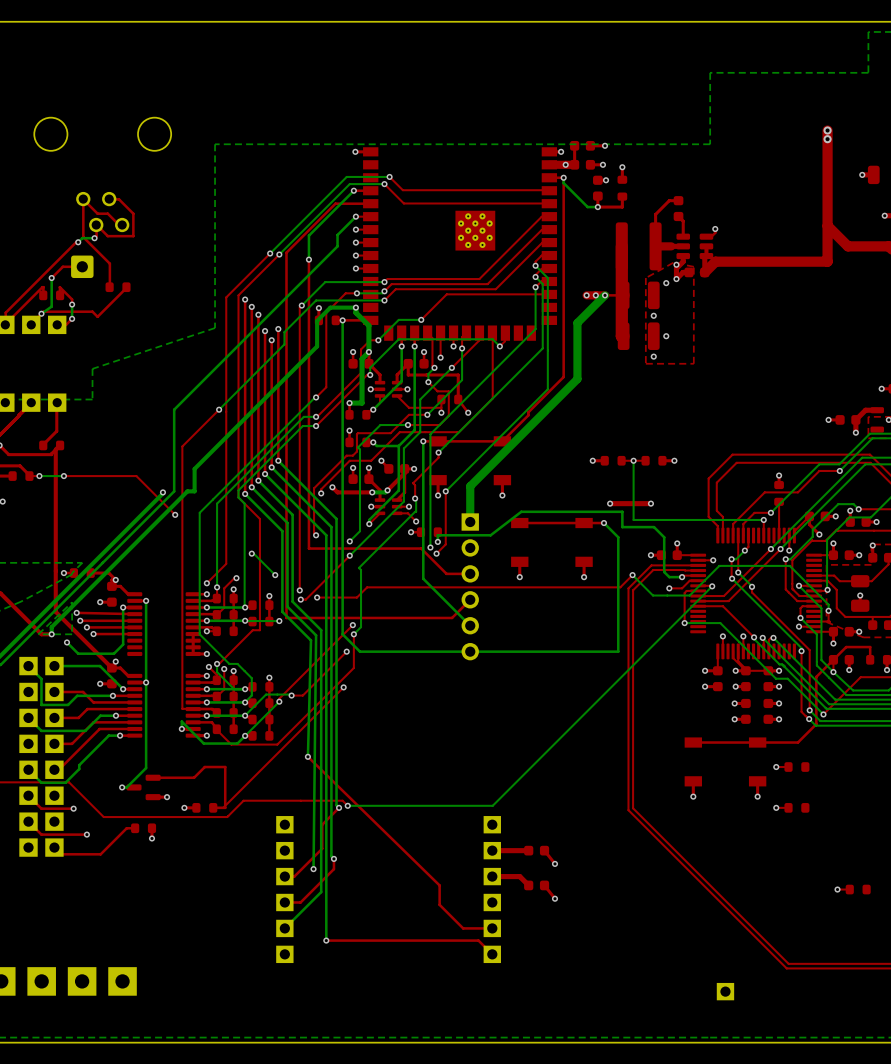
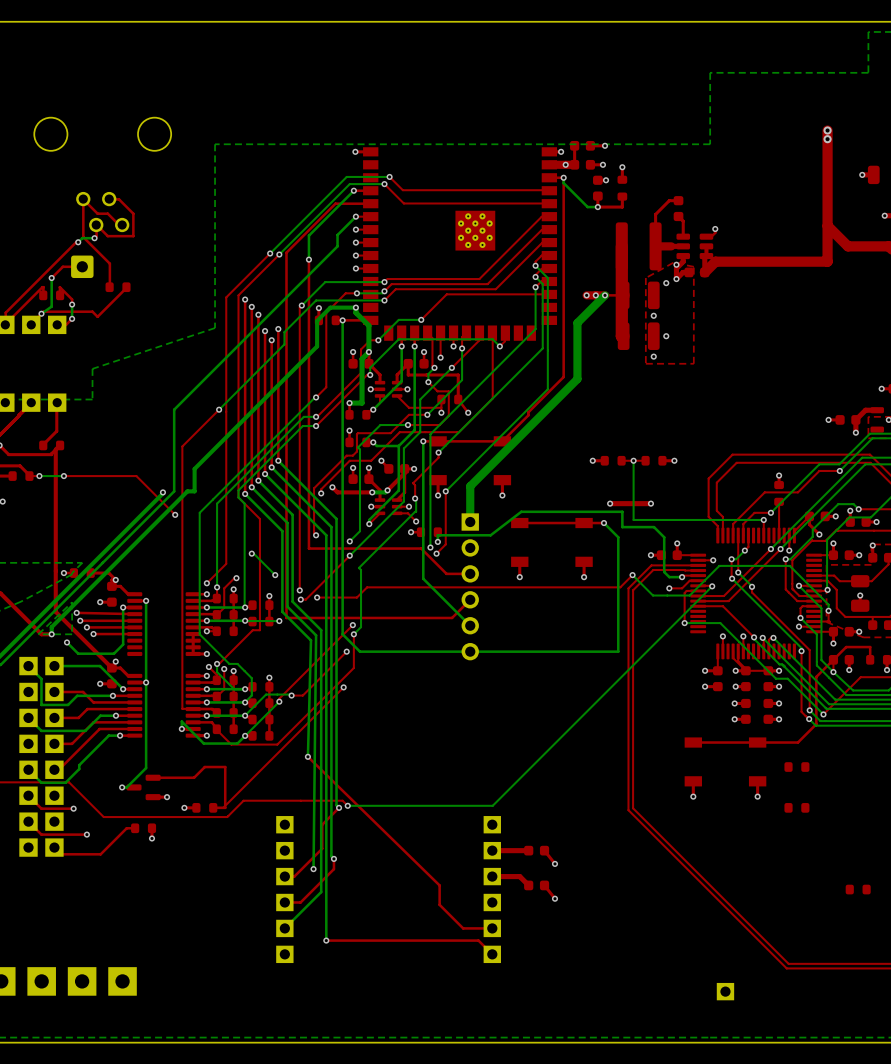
via: (776, 767) -> none
top track: (788, 767) (776, 767) -> none
via: (776, 807) -> none
top track: (788, 807) (776, 807) -> none
via: (837, 889) -> none
top track: (849, 889) (837, 889) -> none

